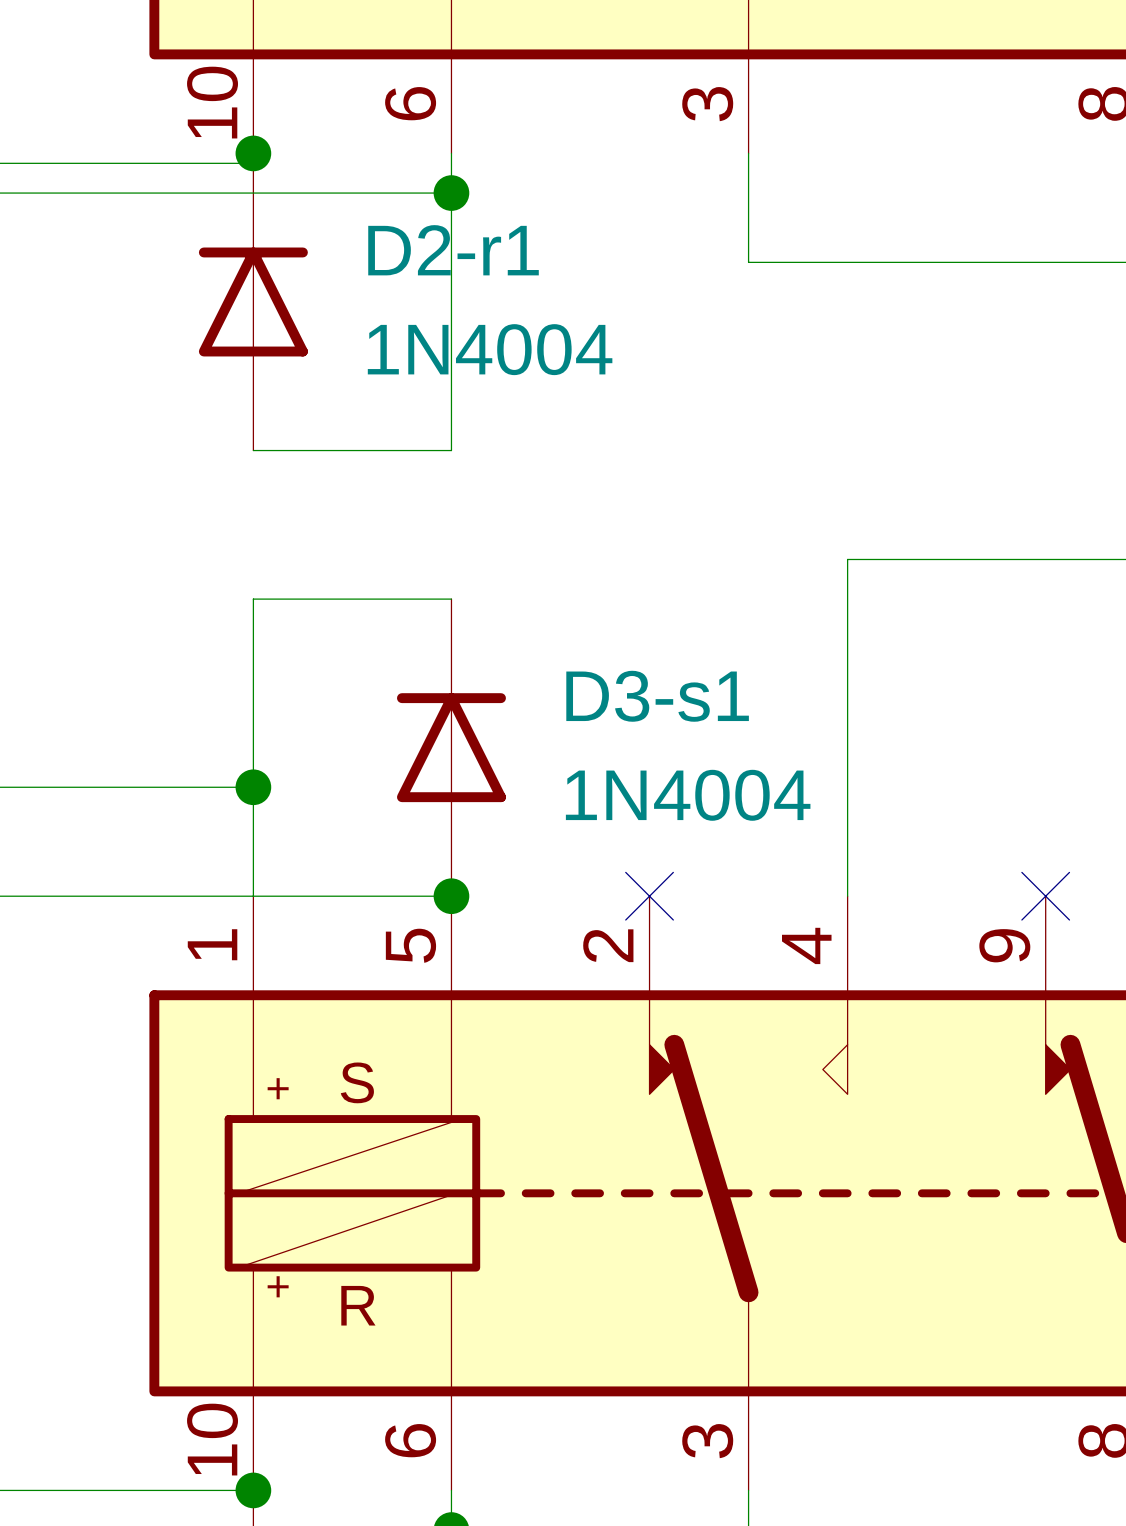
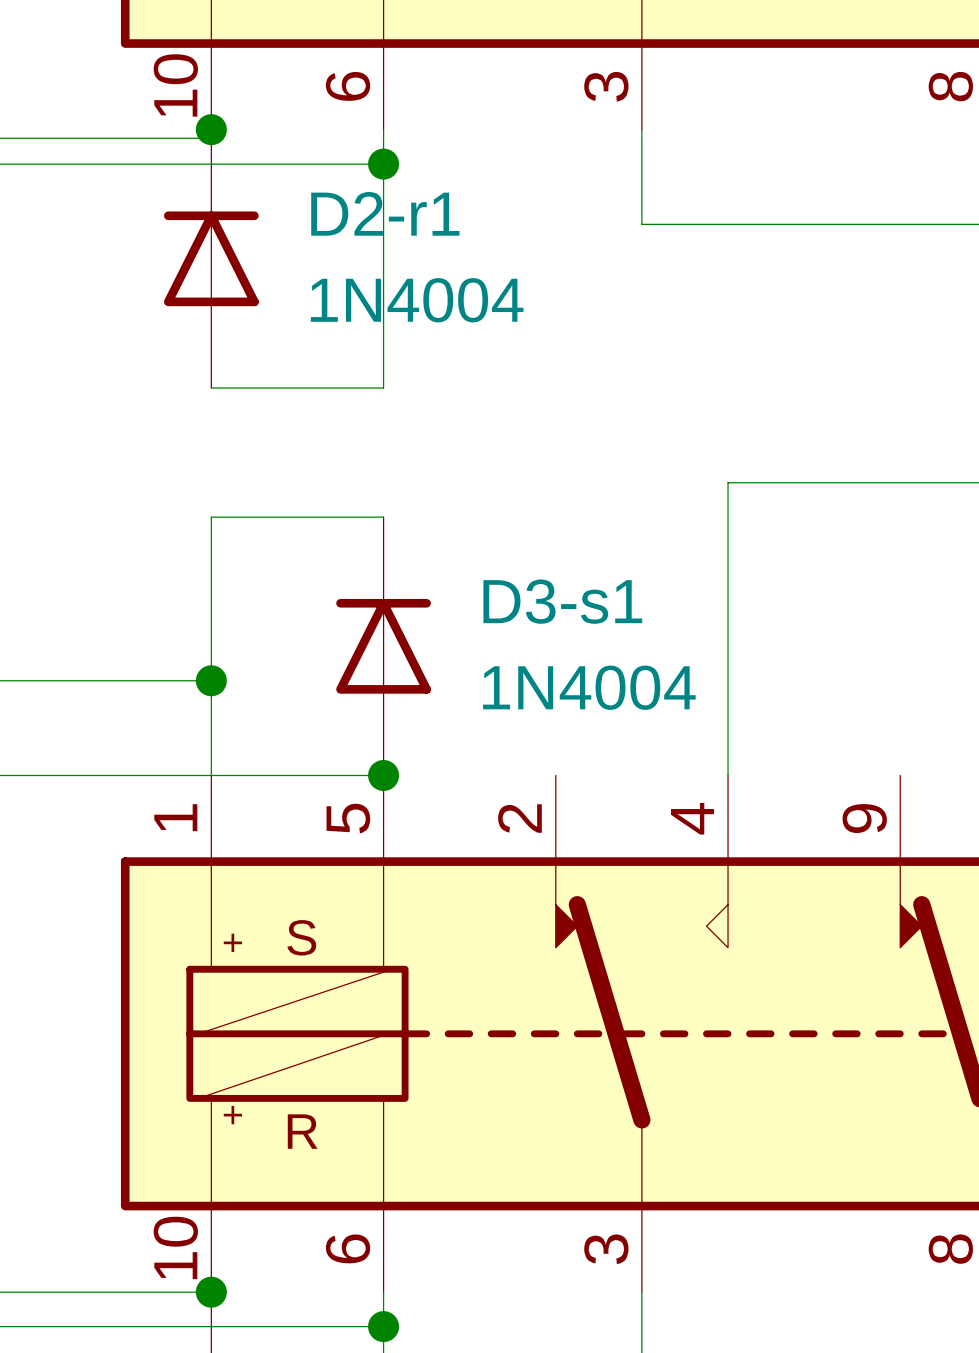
no-connect mark: (649, 896) -> none
no-connect mark: (1045, 896) -> none

